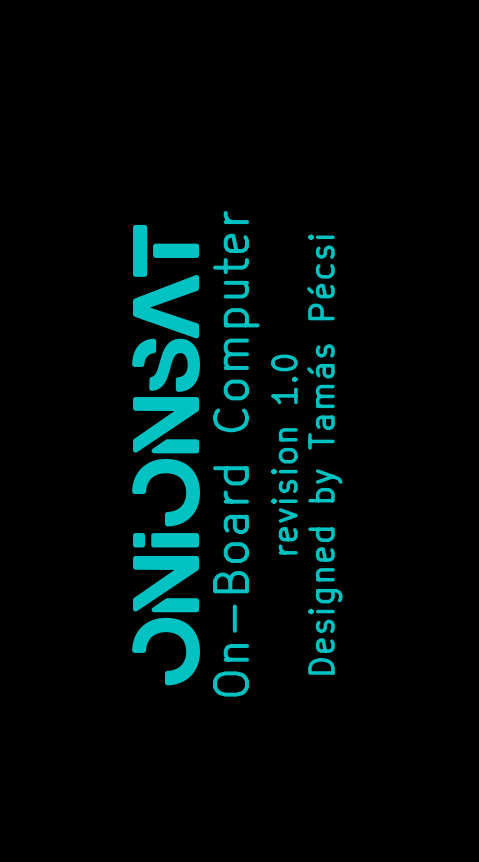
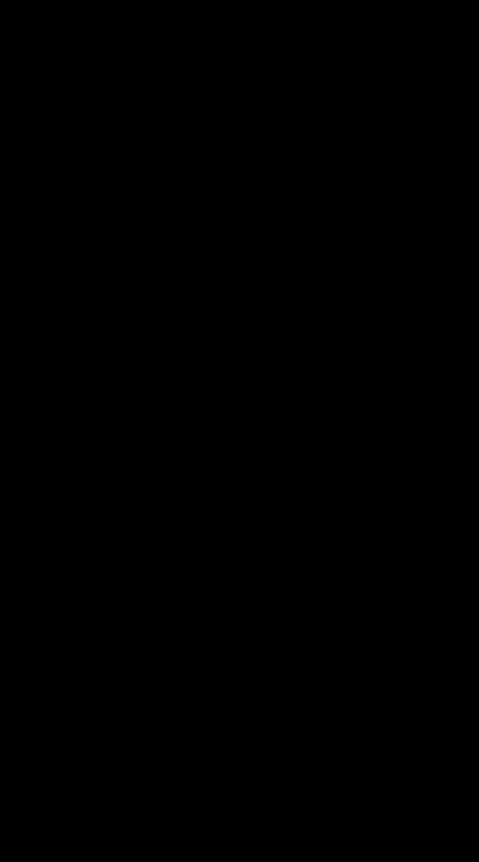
drawing: [132, 224, 200, 686] -> none
text: On-Board Computer (236, 453) -> none
text: revision 1.0 (284, 454) -> none
text: Designed by Tamás Pécsi (324, 454) -> none

